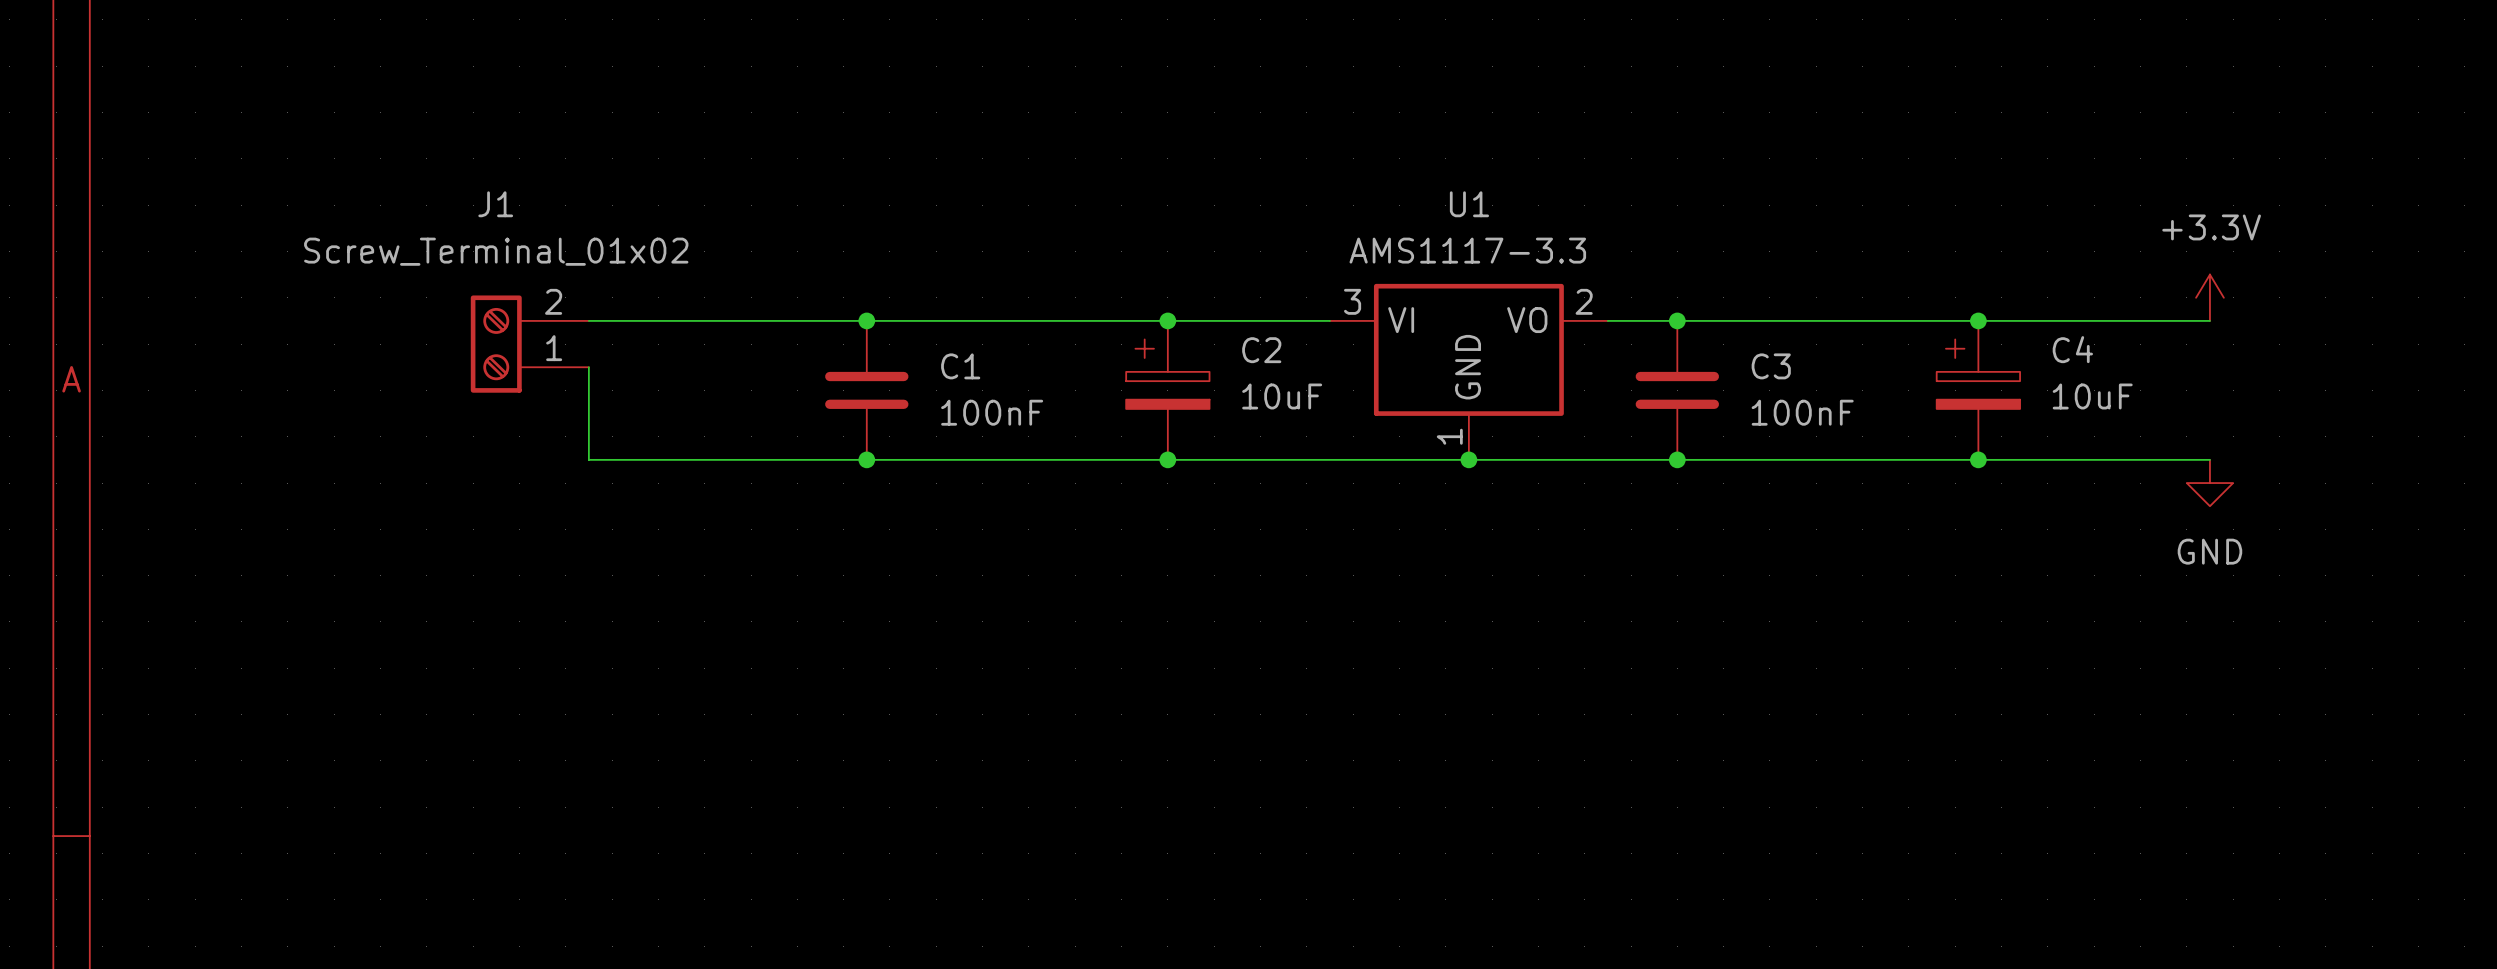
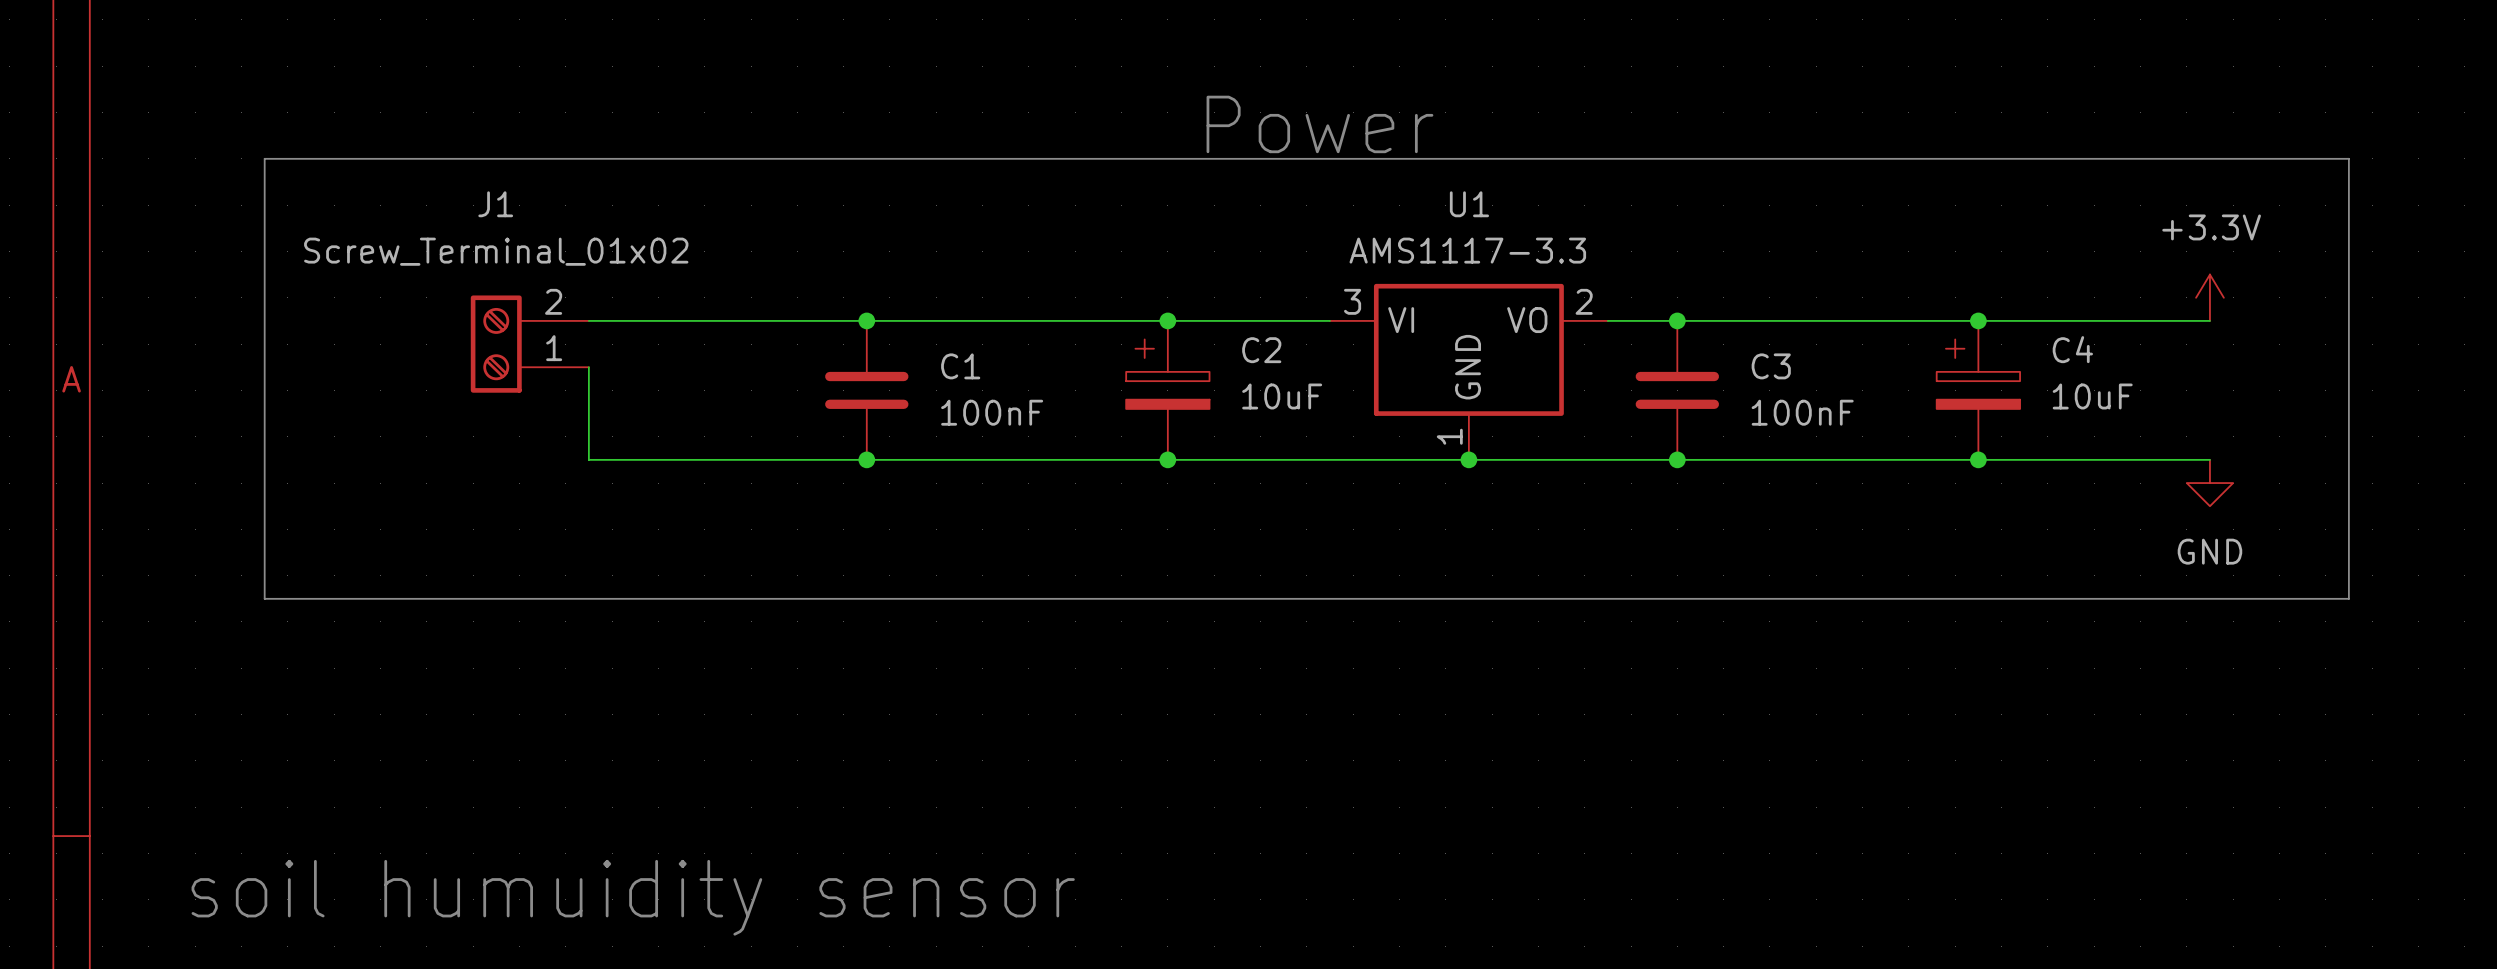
text: none -> Power (1319, 124)
line: none -> (264, 158) (2348, 158) (2348, 598) (264, 598) (264, 158)
text: none -> soil humuidity sensor (633, 897)

